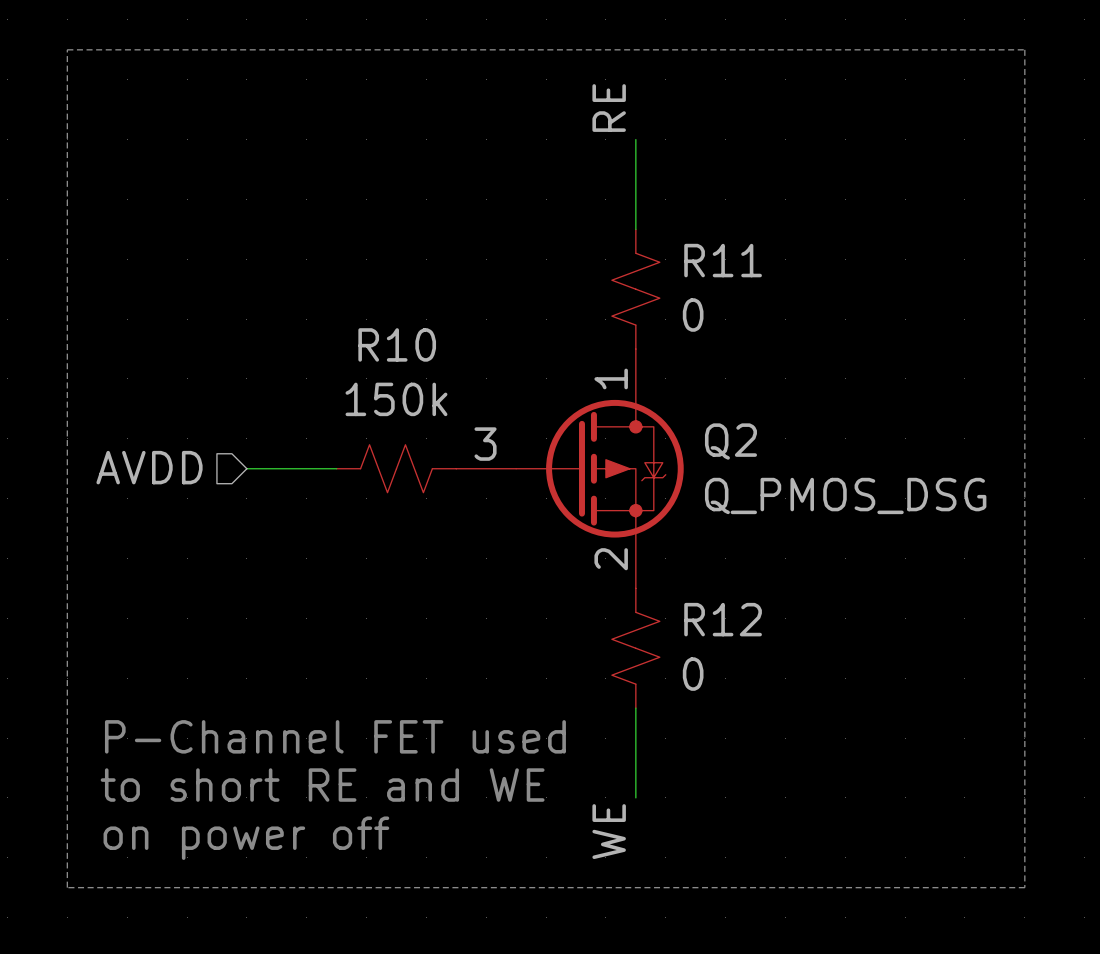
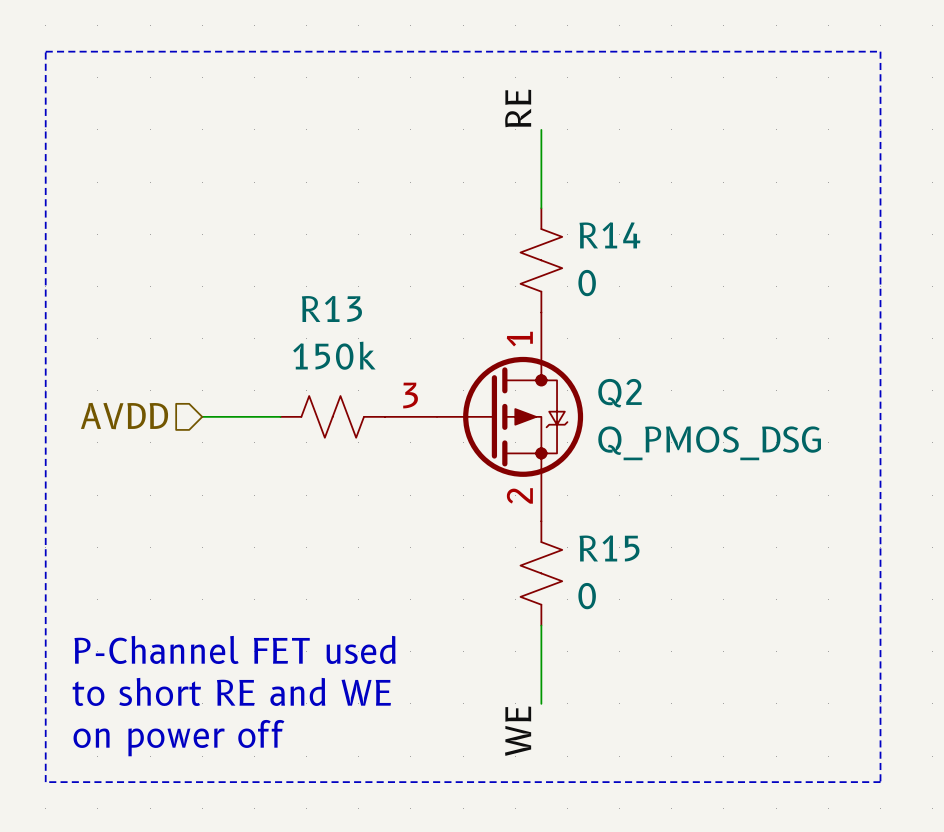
R11 name: R11 (723, 260) -> R14 (609, 235)
R10 name: R10 (397, 344) -> R13 (331, 308)
R12 name: R12 (723, 619) -> R15 (609, 548)

